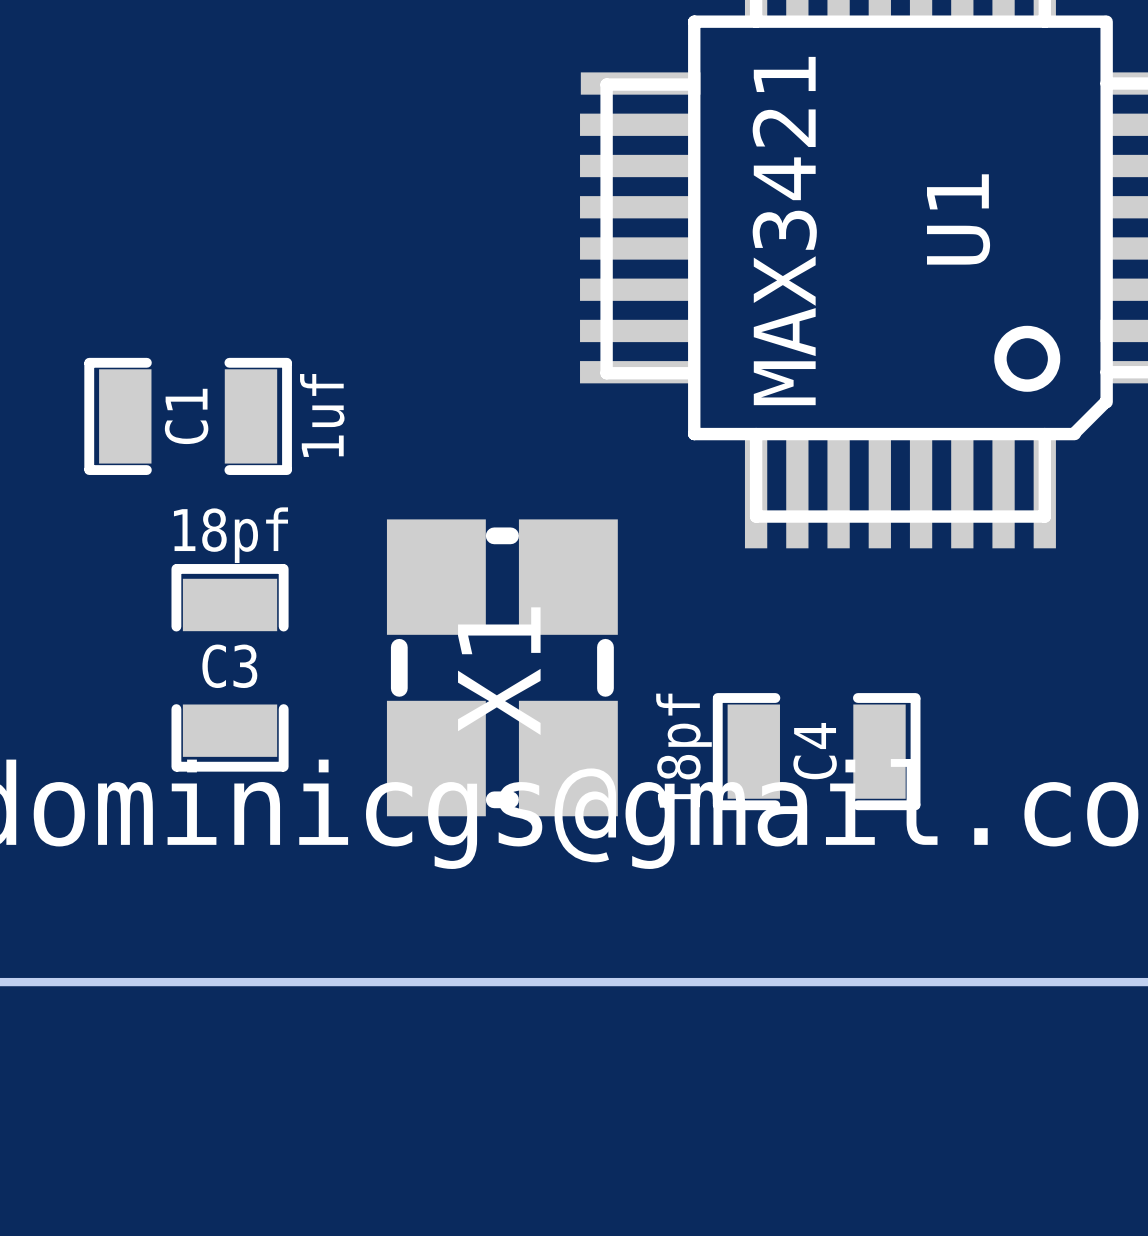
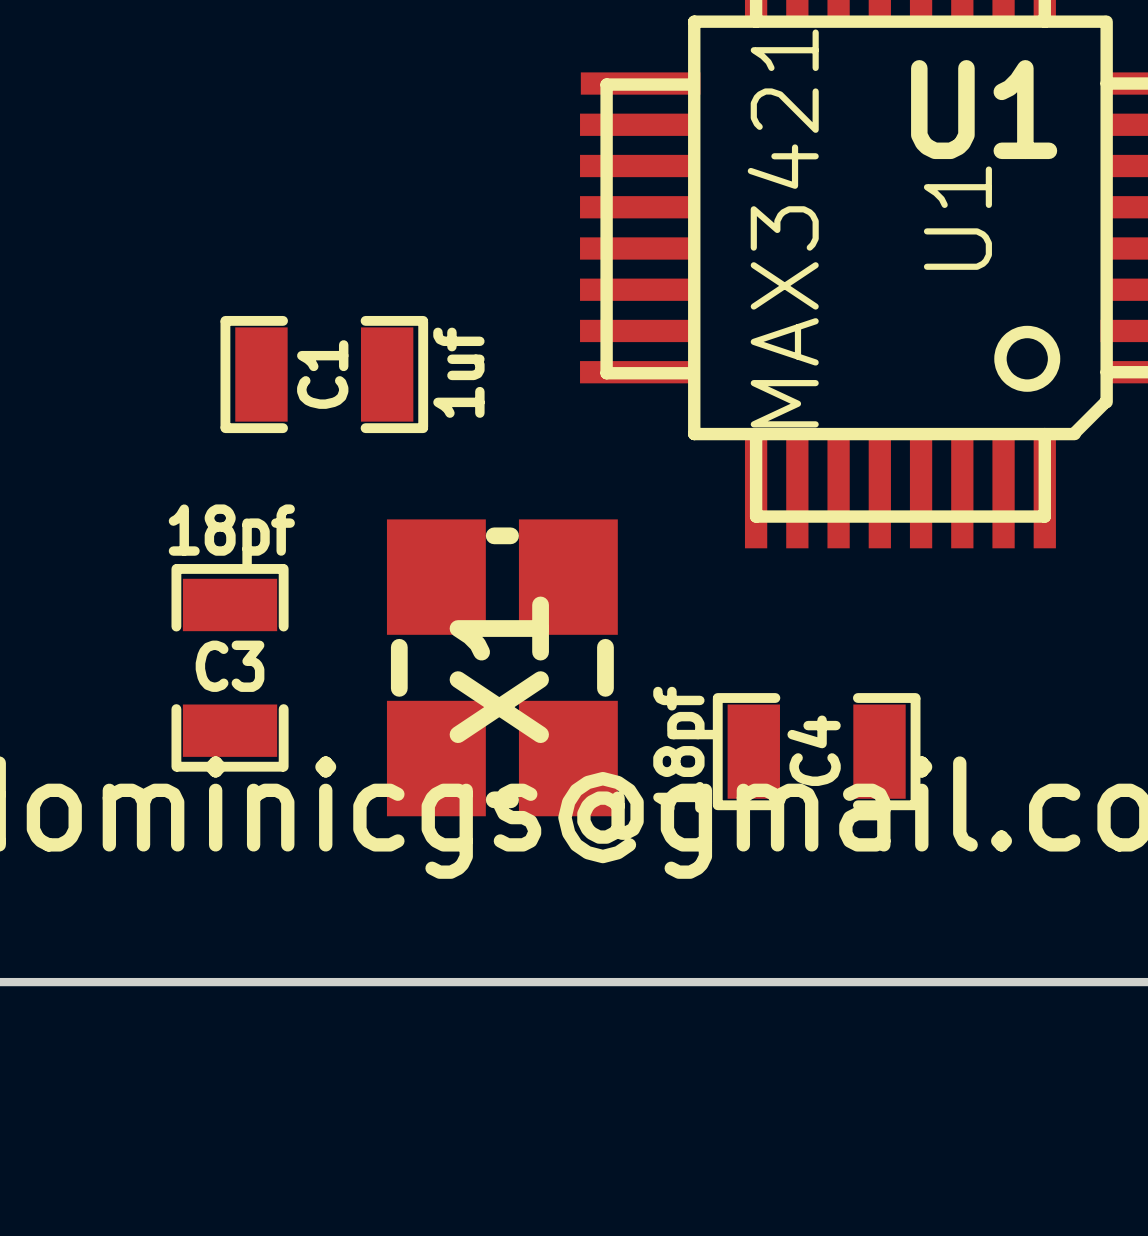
text: none -> U1 (984, 109)
C1 position: (188, 416) -> (324, 374)

